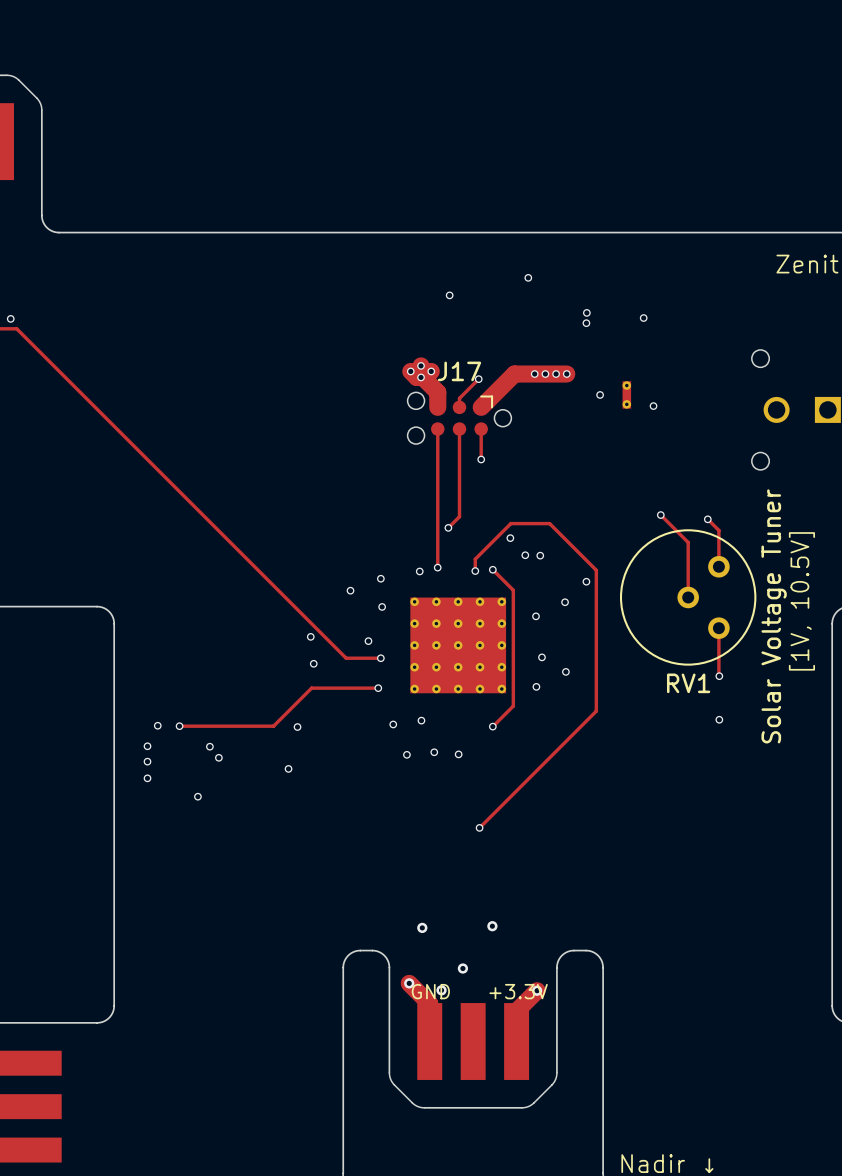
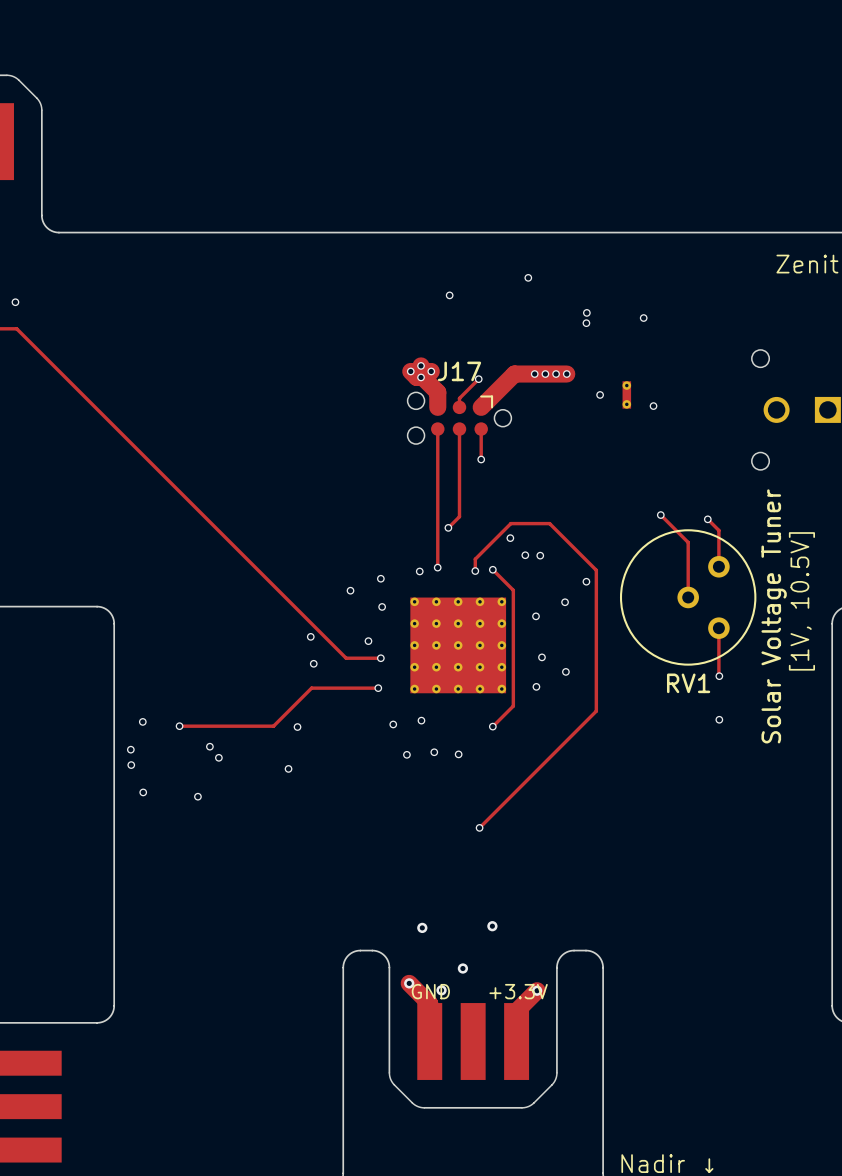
via: none -> (15, 302)
via: (10, 318) -> none
via: none -> (142, 721)
via: (157, 725) -> none
via: (147, 746) -> none
via: none -> (130, 749)
via: (147, 761) -> none
via: none -> (131, 765)
via: (147, 778) -> none
via: none -> (143, 792)

